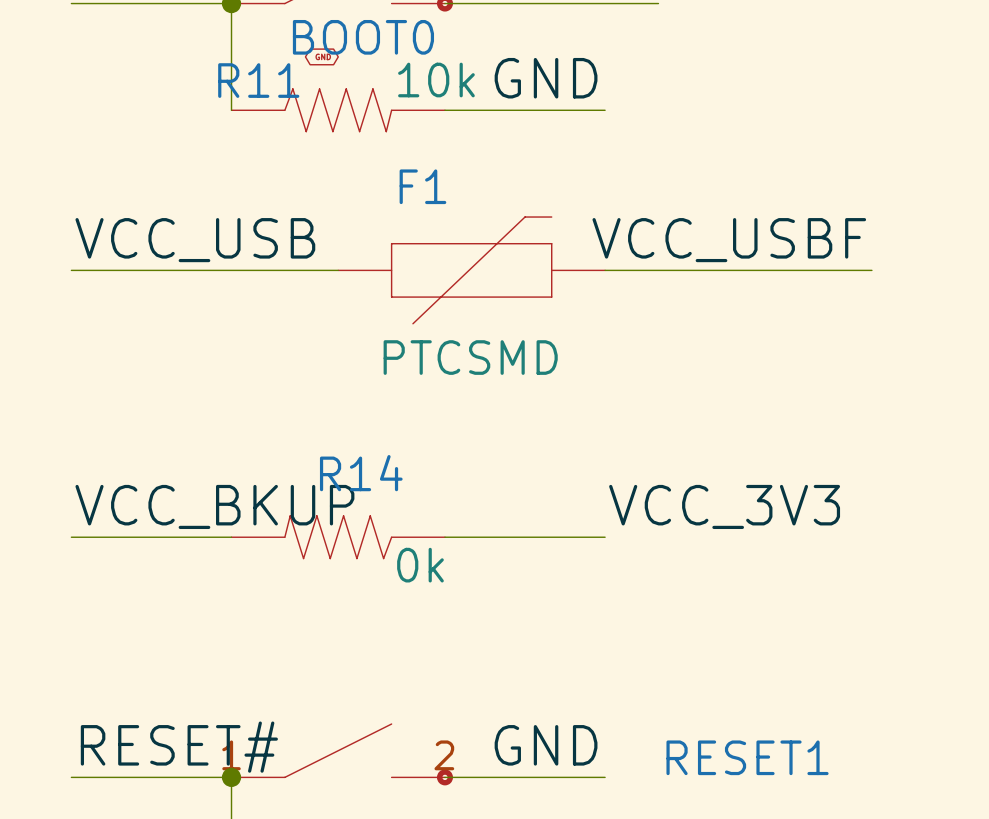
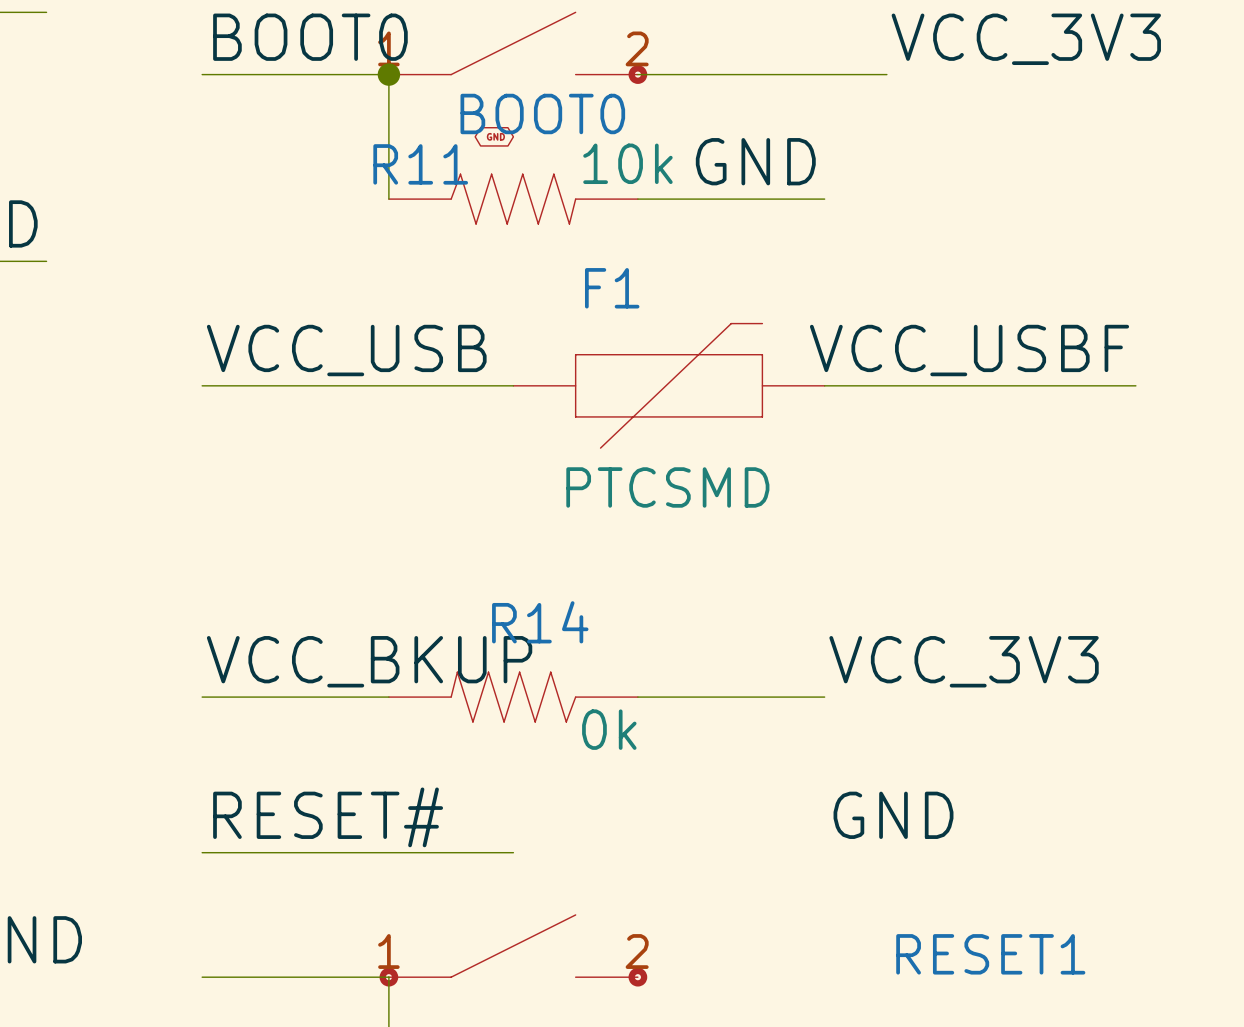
wire: none -> (202, 852) (513, 852)
label position: GND (546, 745) -> GND (893, 815)
label position: RESET# (179, 747) -> RESET# (328, 817)
junction: (231, 777) -> none
wire: (444, 777) (605, 777) -> none

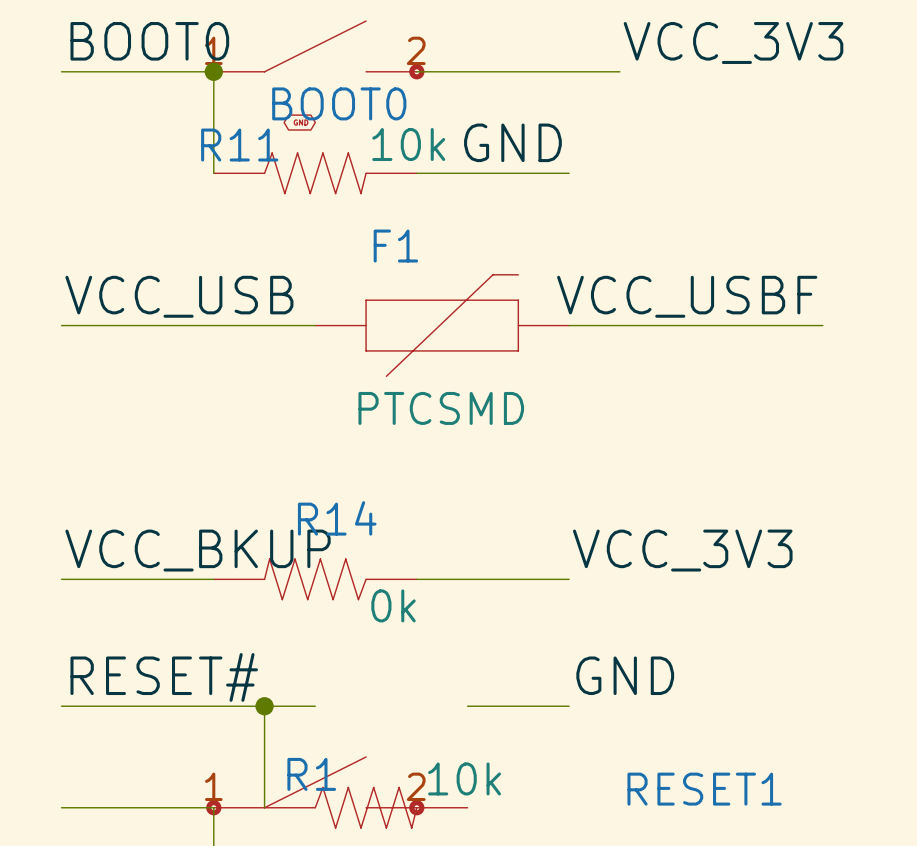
wire: none -> (264, 706) (264, 807)
junction: none -> (264, 706)
wire: none -> (467, 706) (569, 706)
R1: none -> 10k (366, 807)

